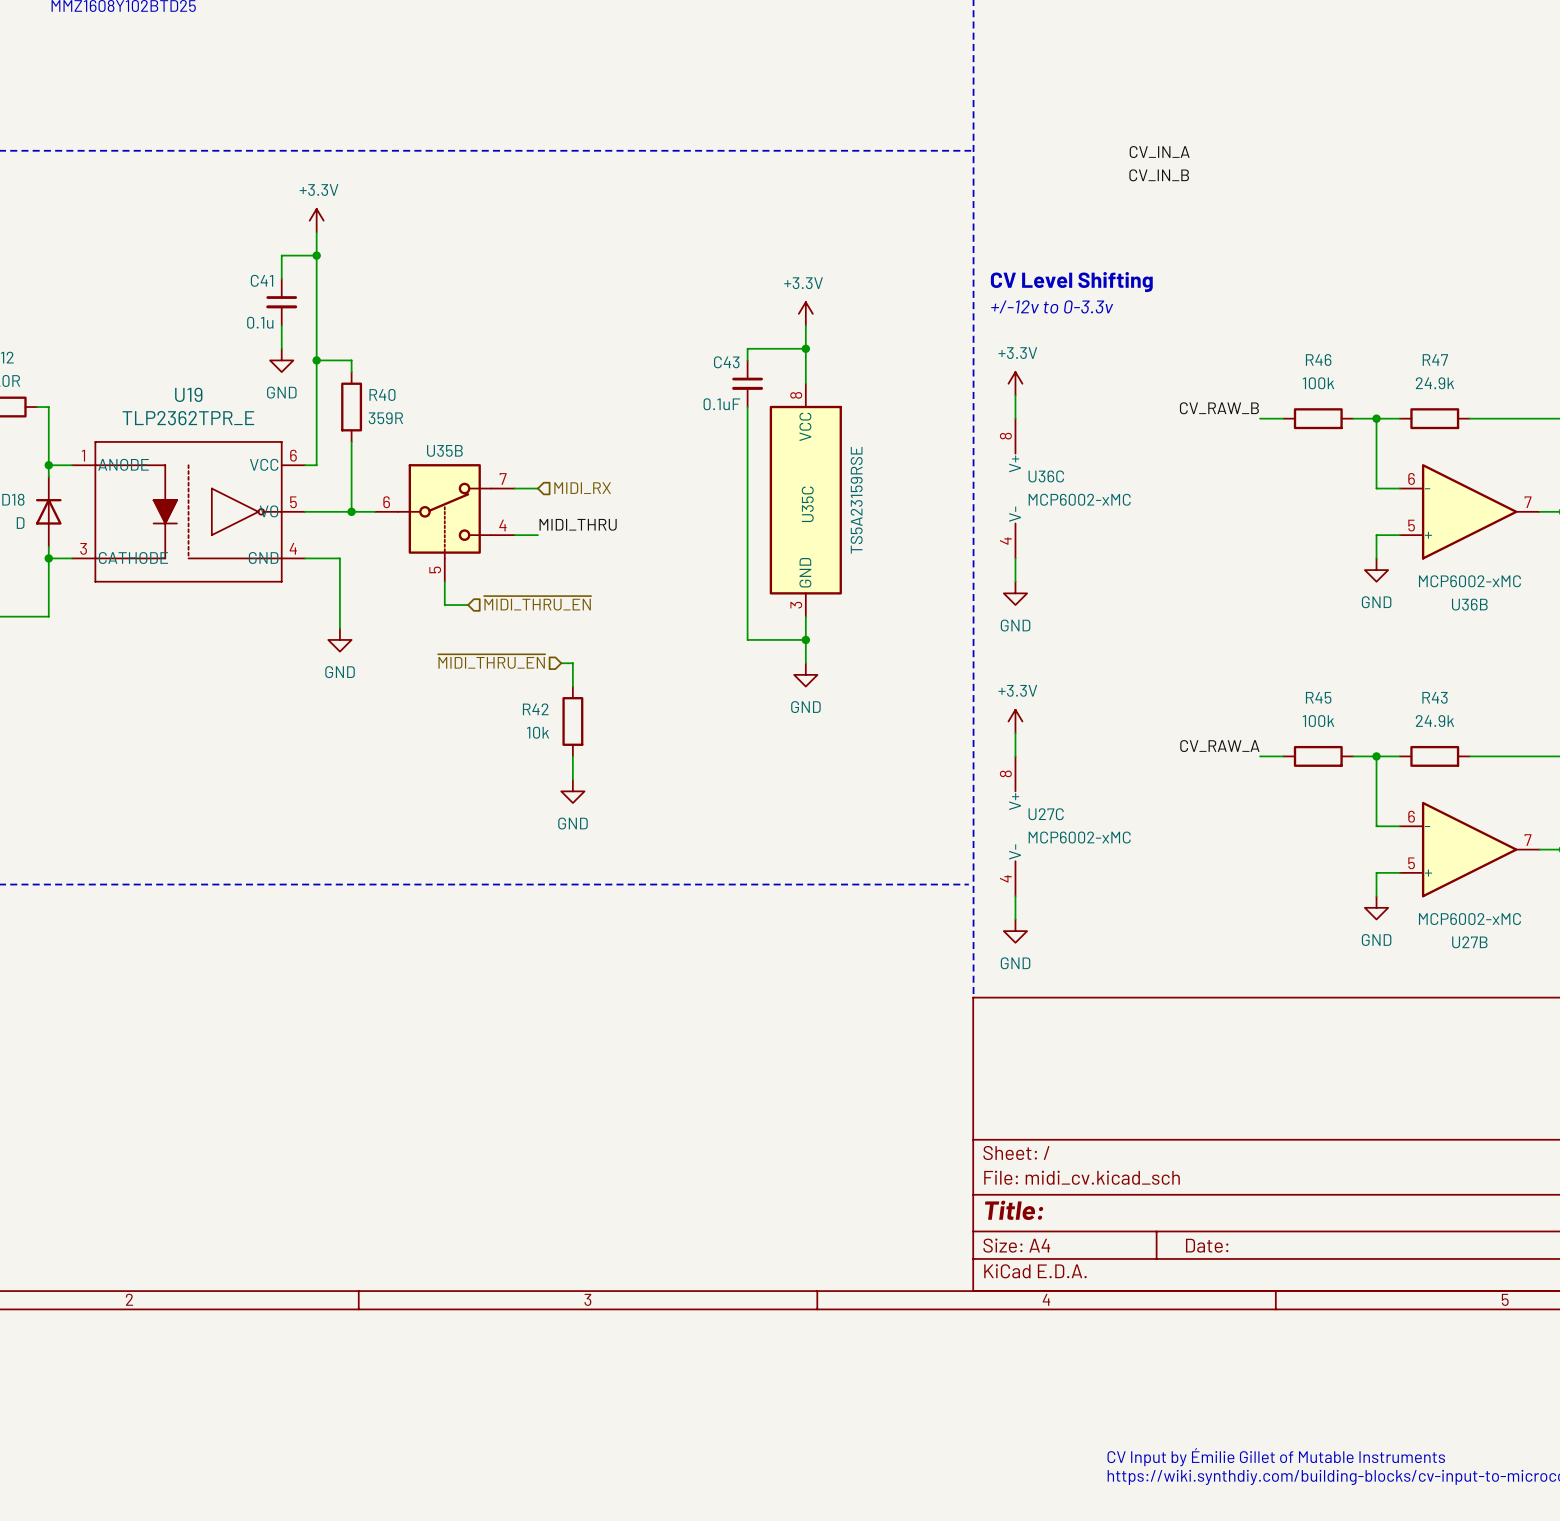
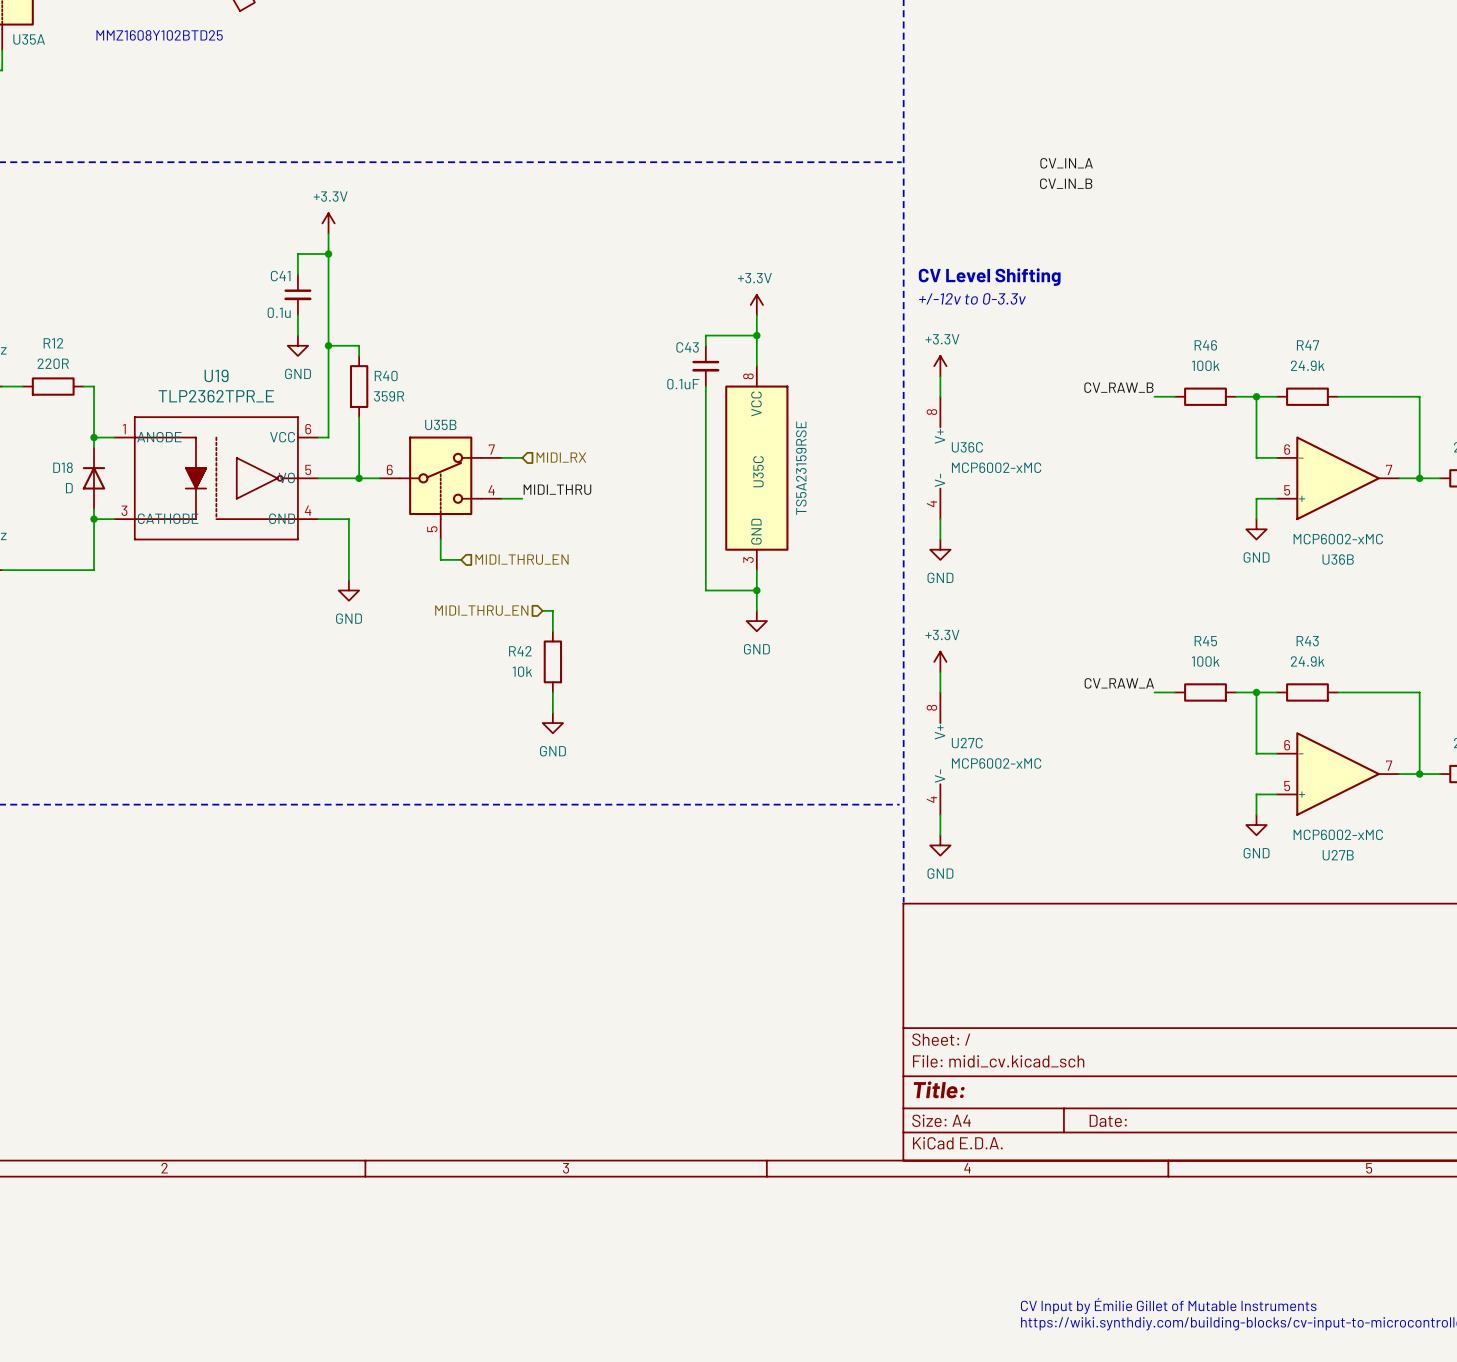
hierarchical label: ~{MIDI_THRU_EN} (537, 603) -> MIDI_THRU_EN (522, 559)
hierarchical label: ~{MIDI_THRU_EN} (491, 661) -> MIDI_THRU_EN (481, 610)

